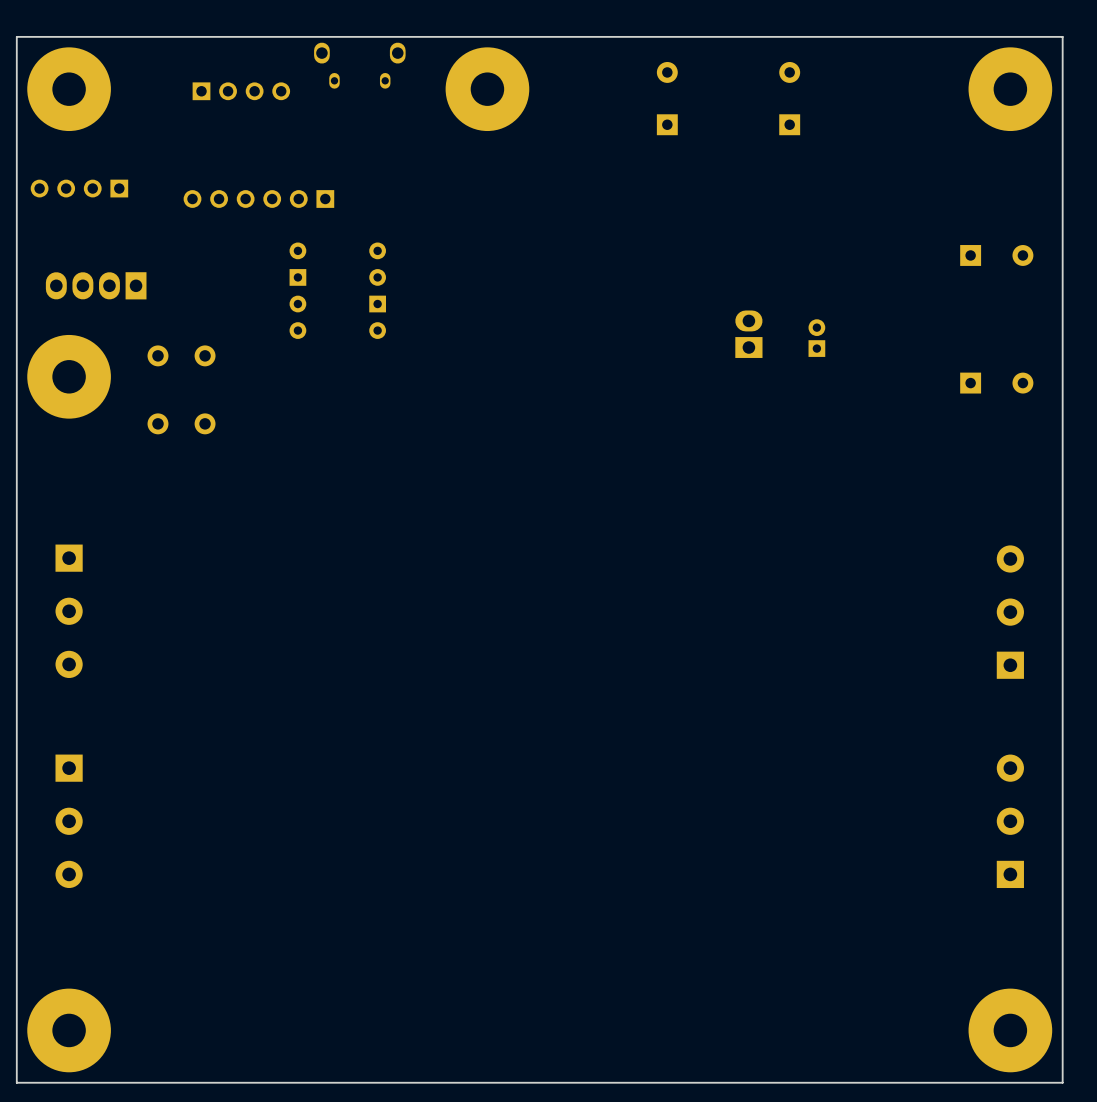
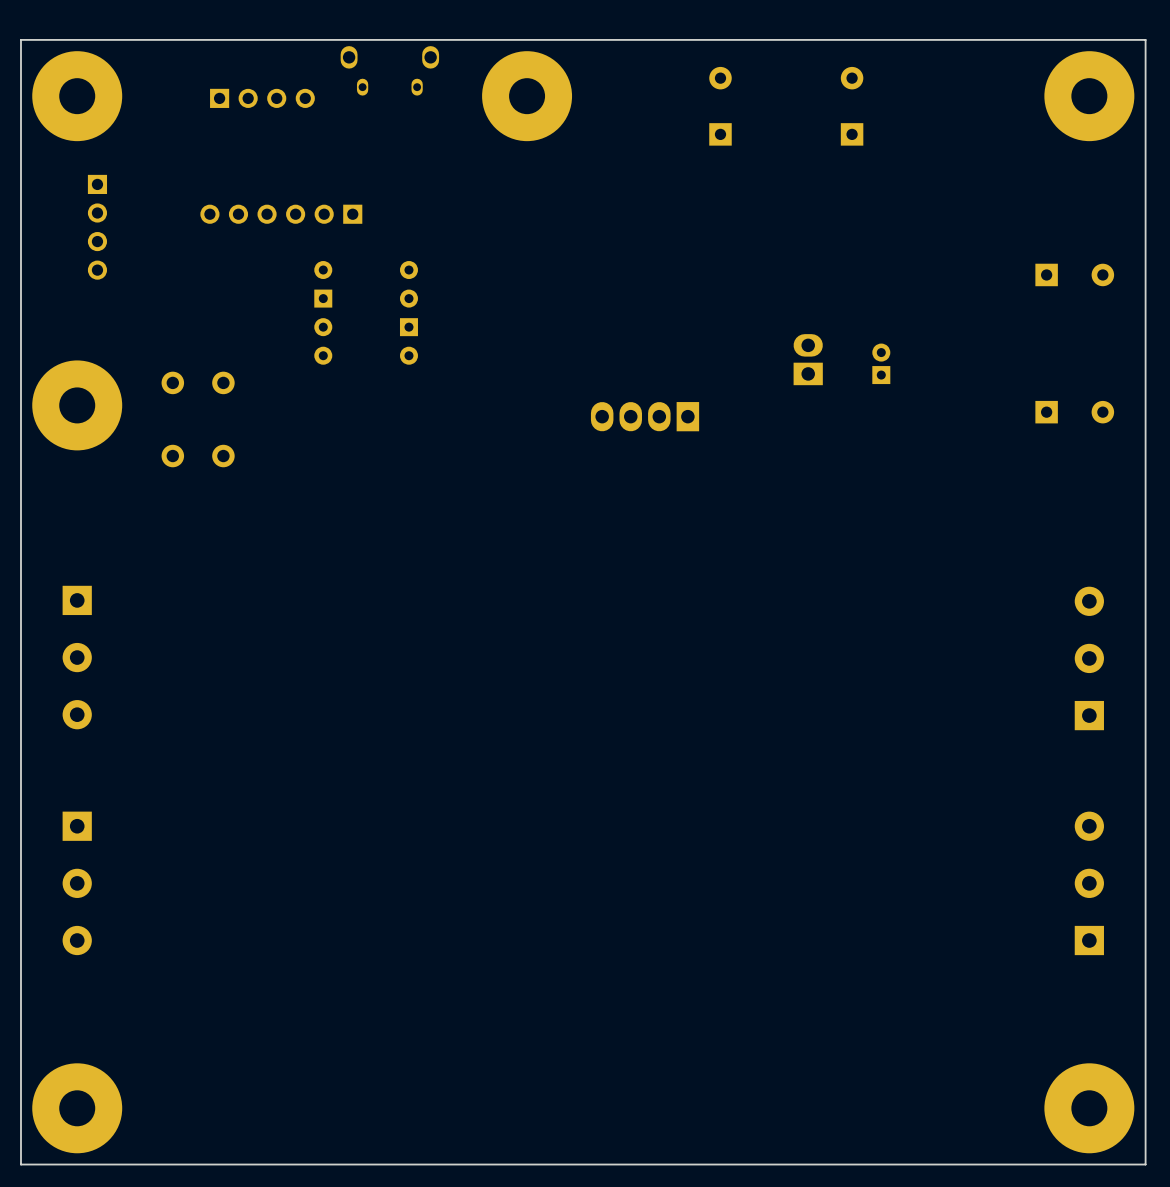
part rotation: 0° (79, 188) -> 90° counterclockwise (97, 227)
part: (96, 285) -> none
part: none -> (645, 416)

